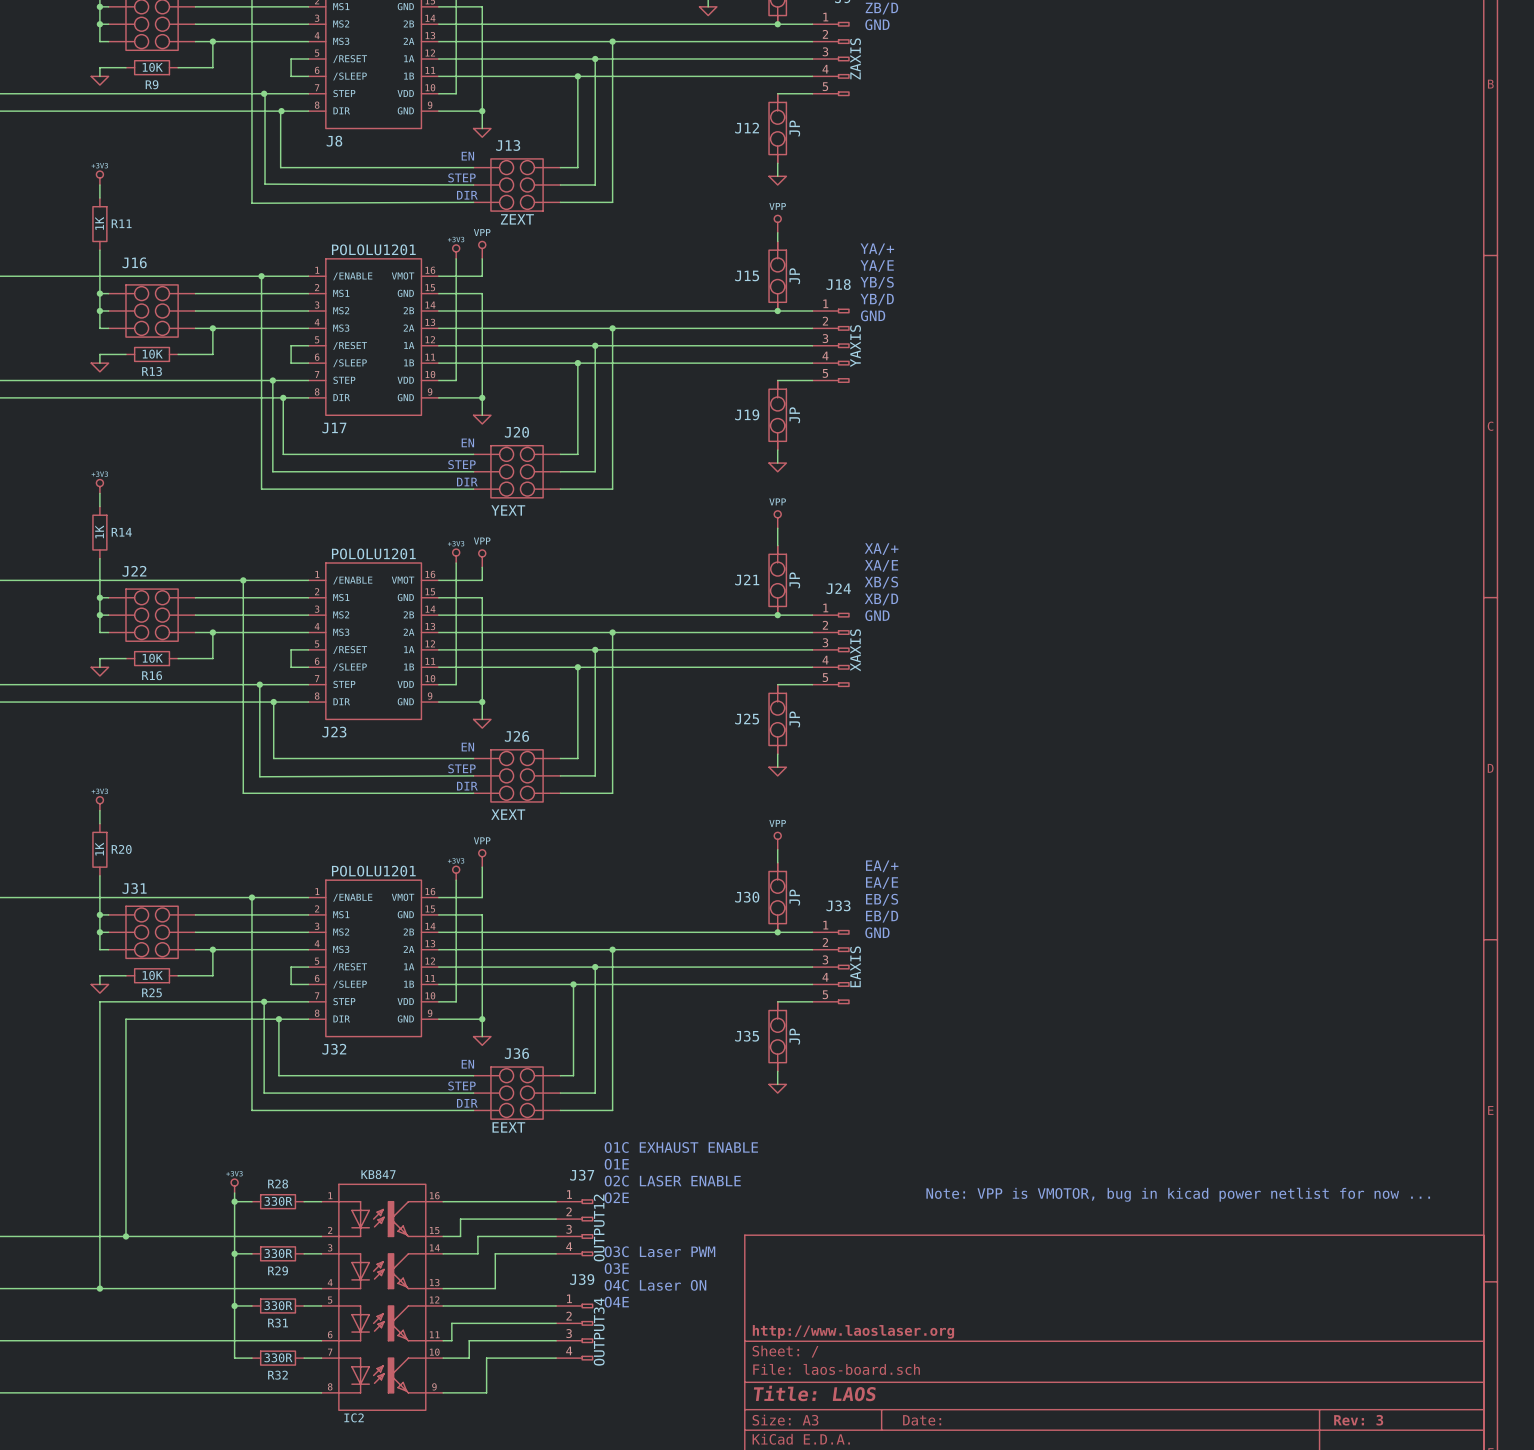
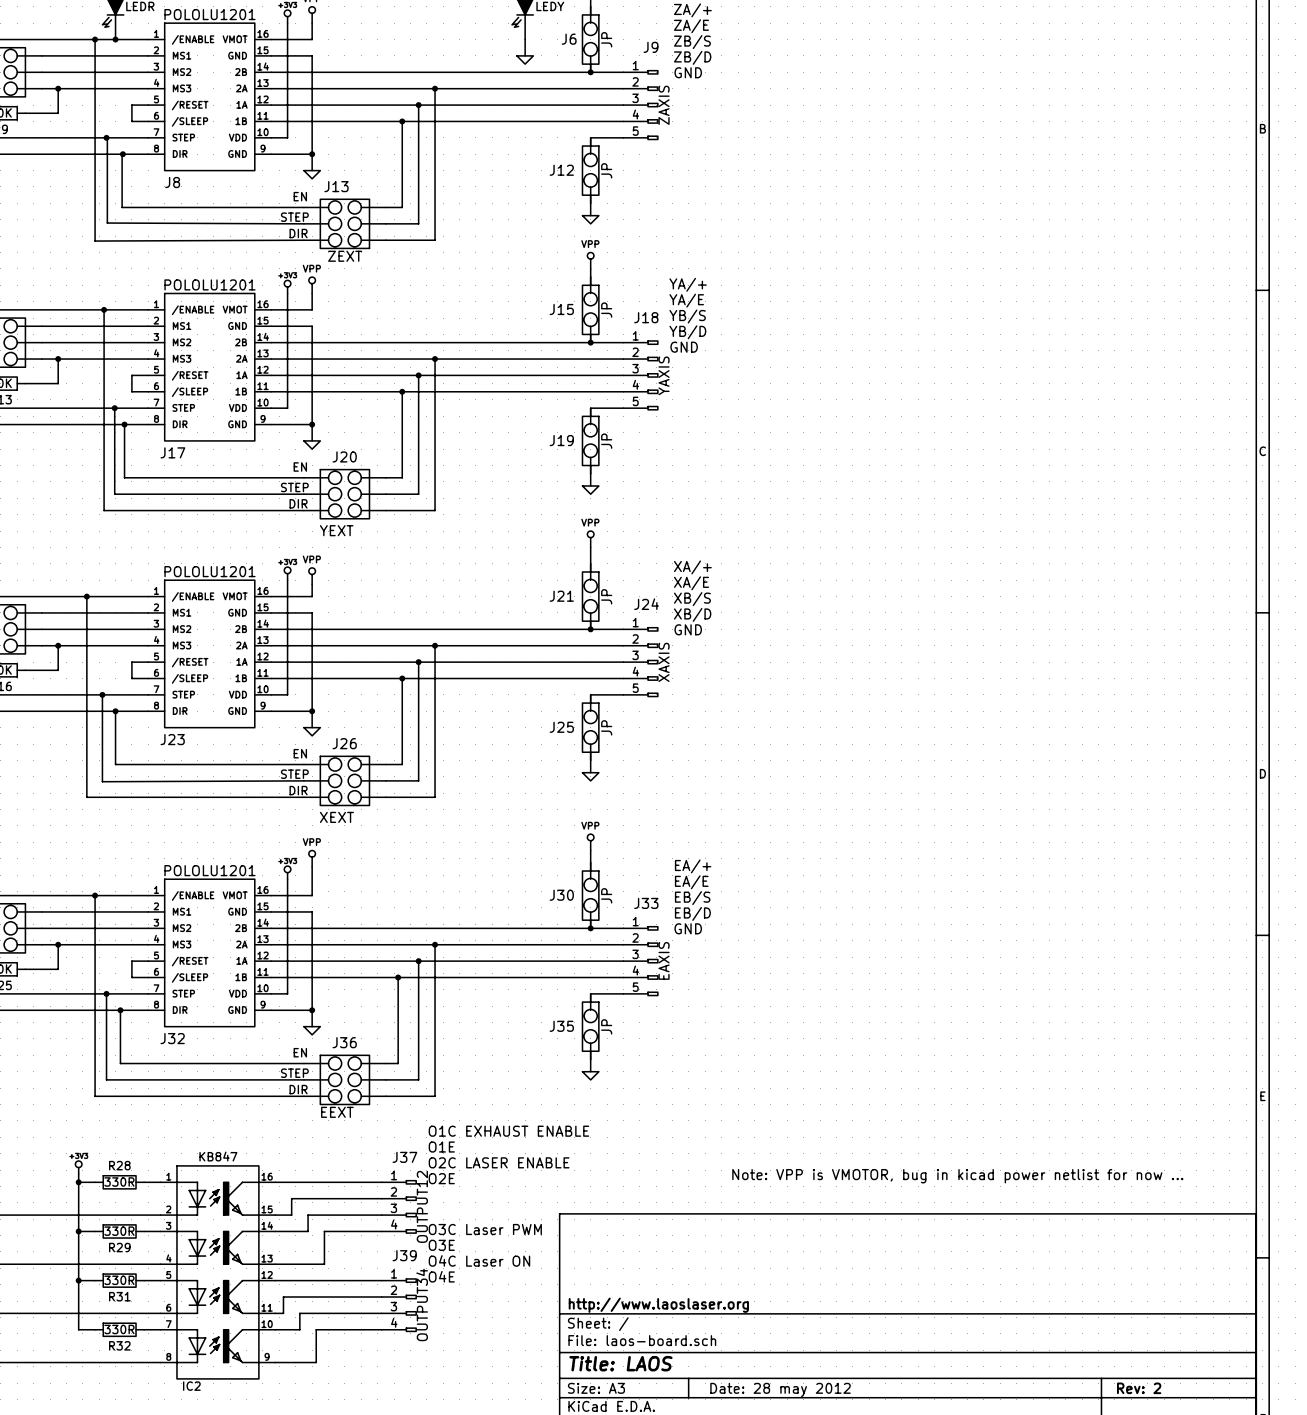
title block: Date: (922, 1420) -> Date: 28 may 2012 (780, 1389)
title block: Rev: 3 (1358, 1420) -> Rev: 2 (1139, 1388)

